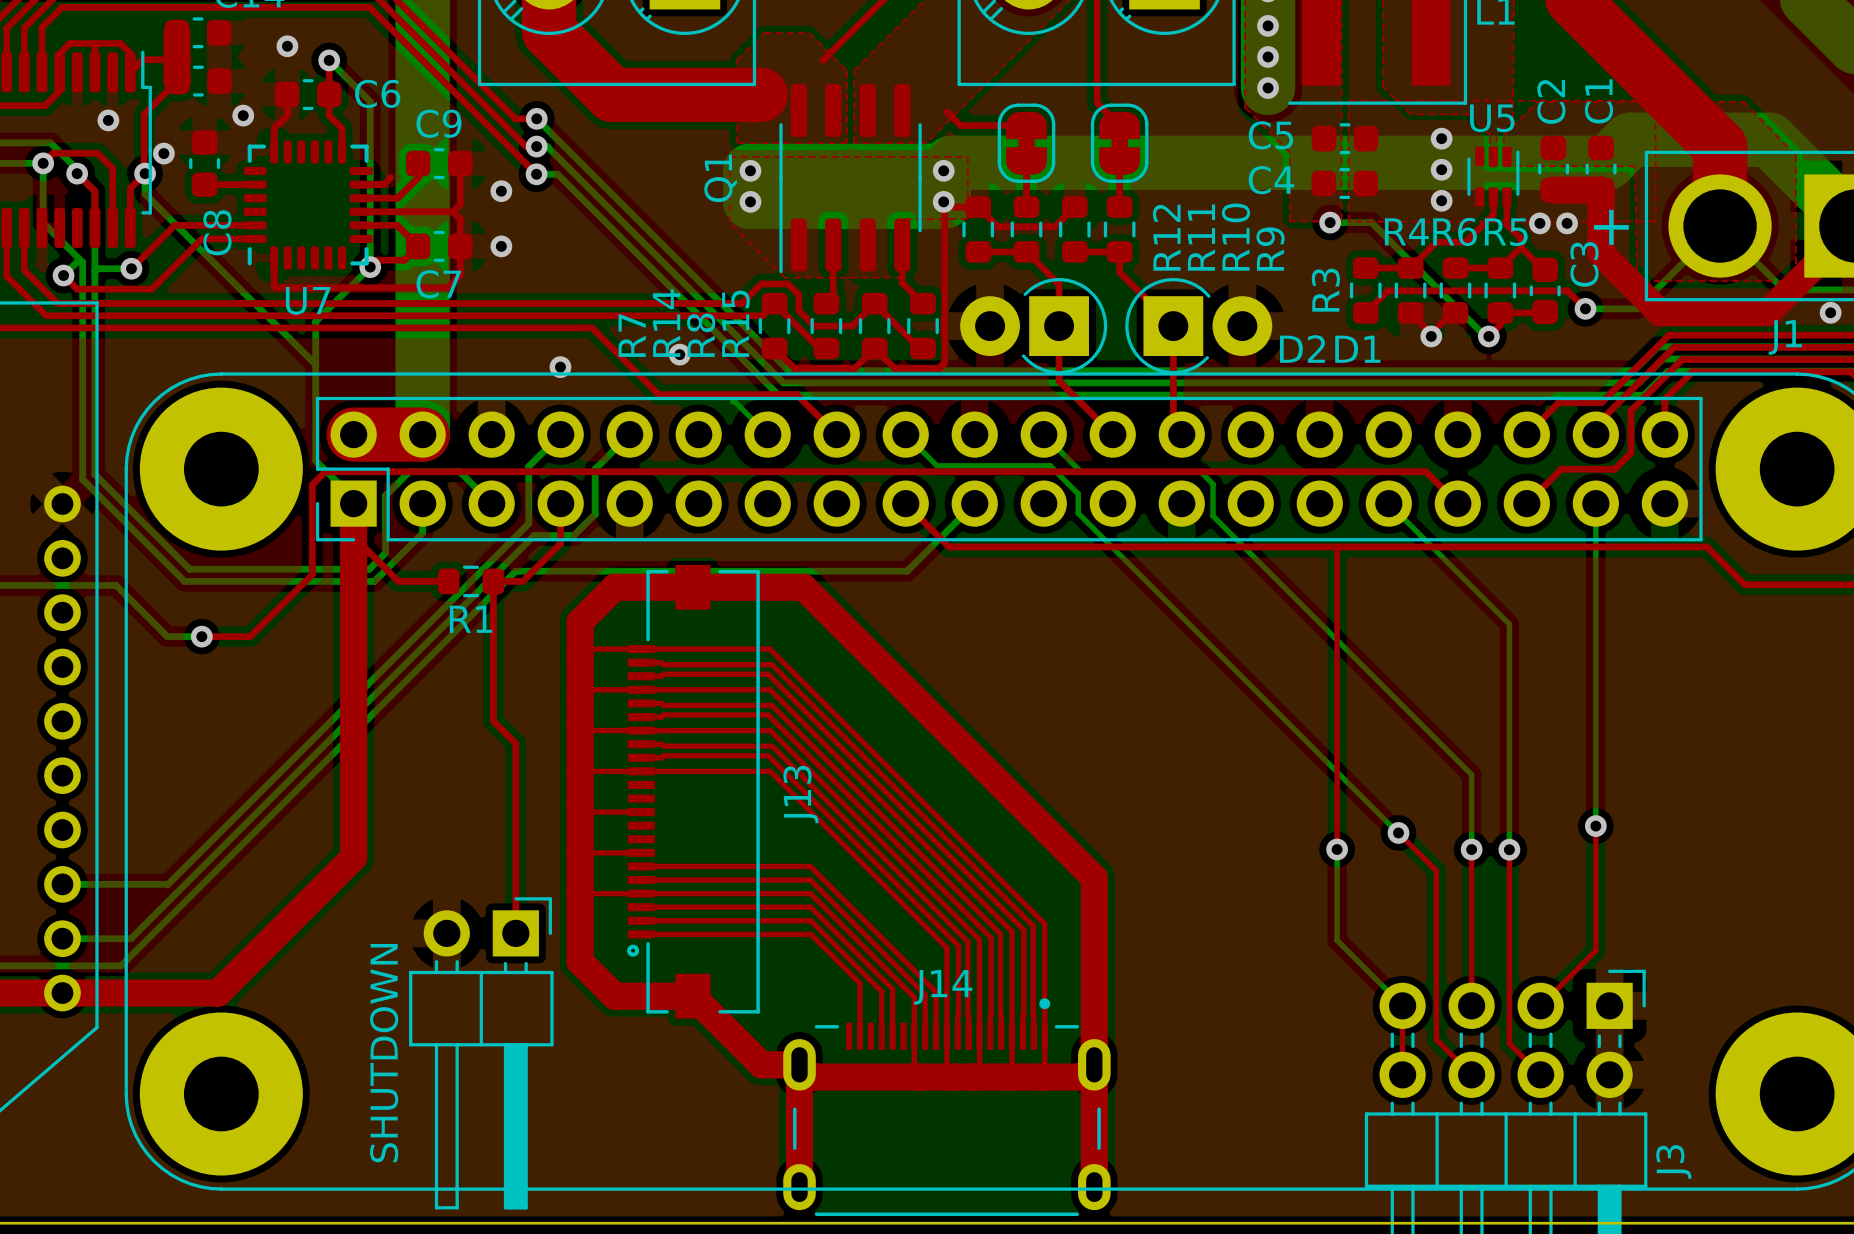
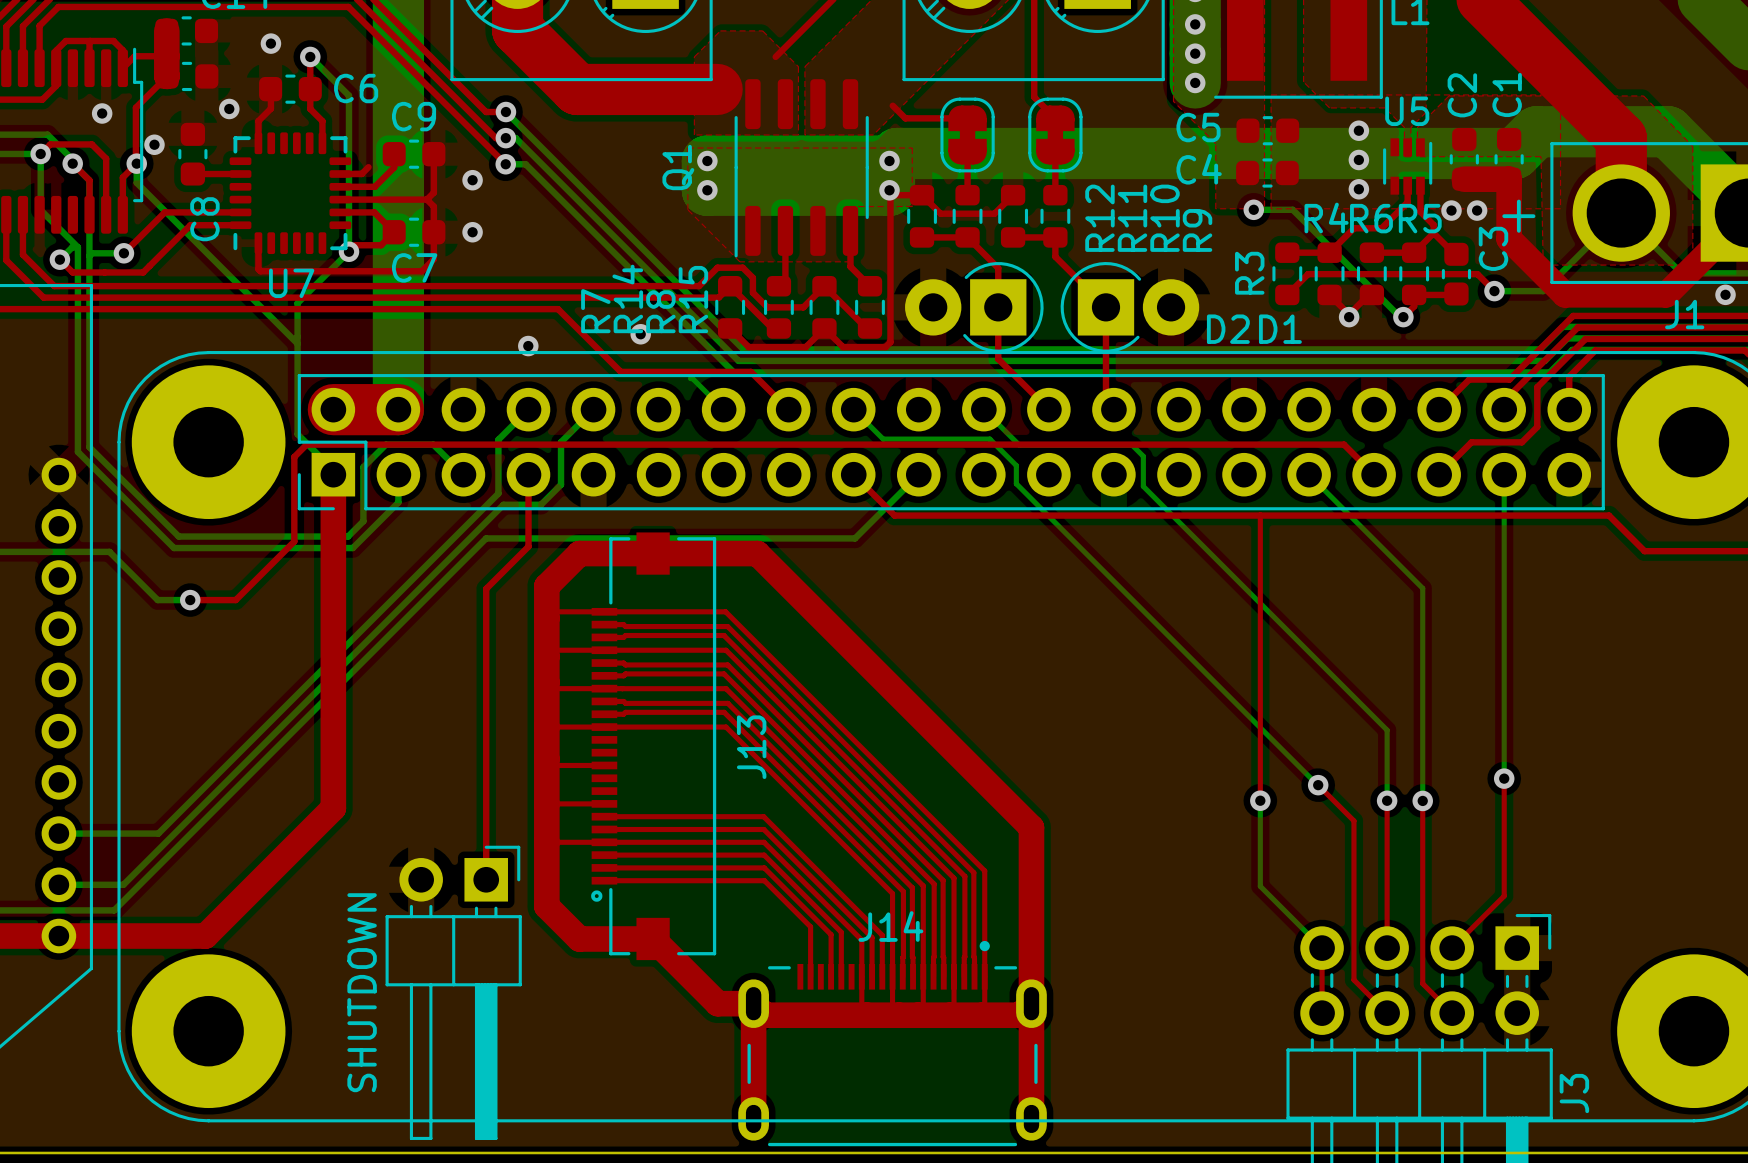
top track: (353, 503) (353, 536) (398, 581) (448, 581) -> none
top track: (560, 543) (522, 581) (493, 581) (493, 721) (515, 743) -> (528, 512) (528, 546) (486, 588) (486, 700)
R1: (470, 581) -> none

